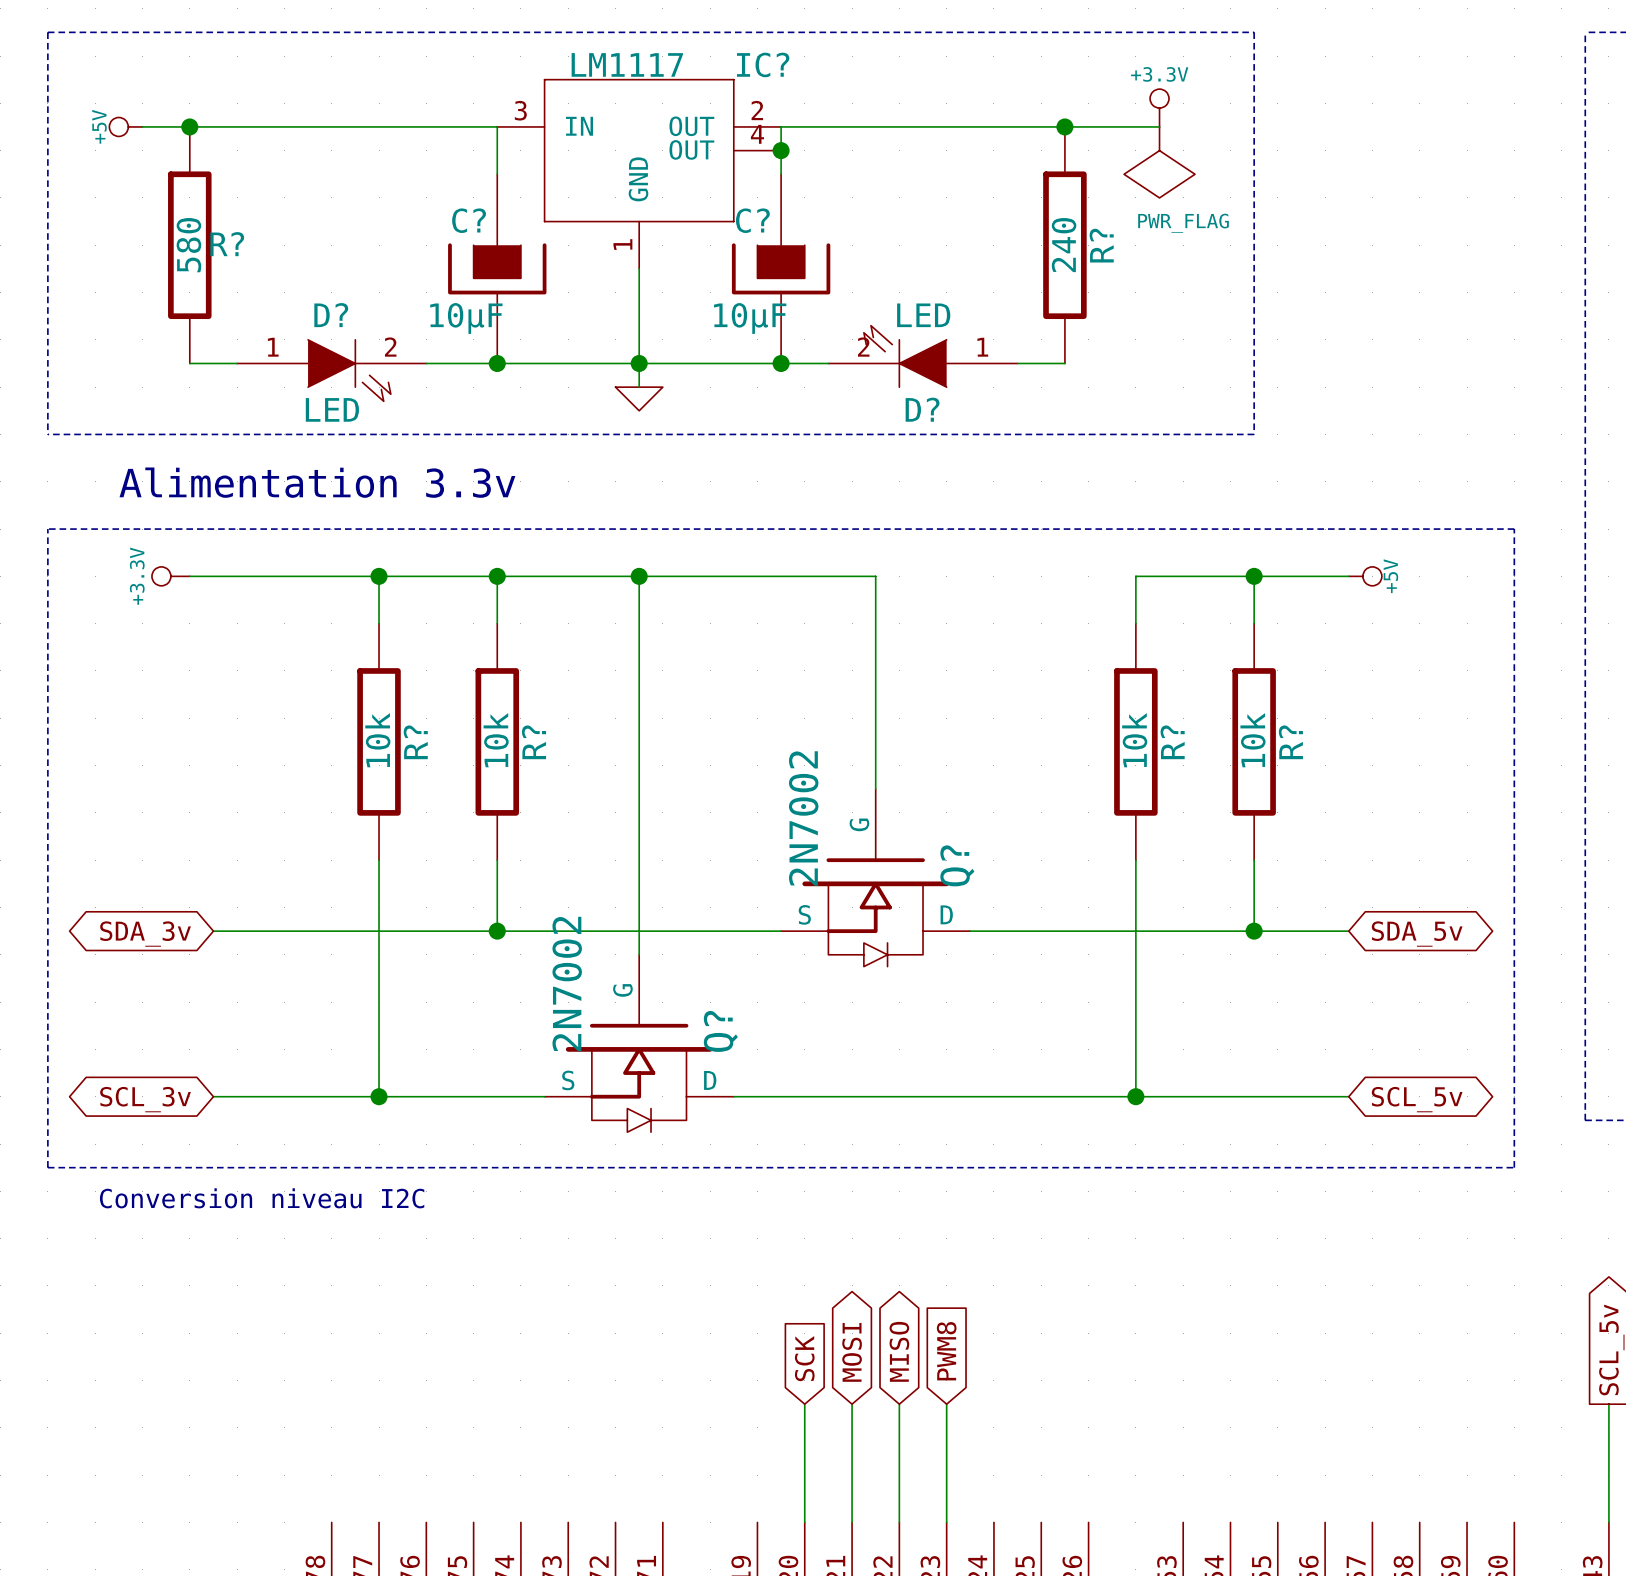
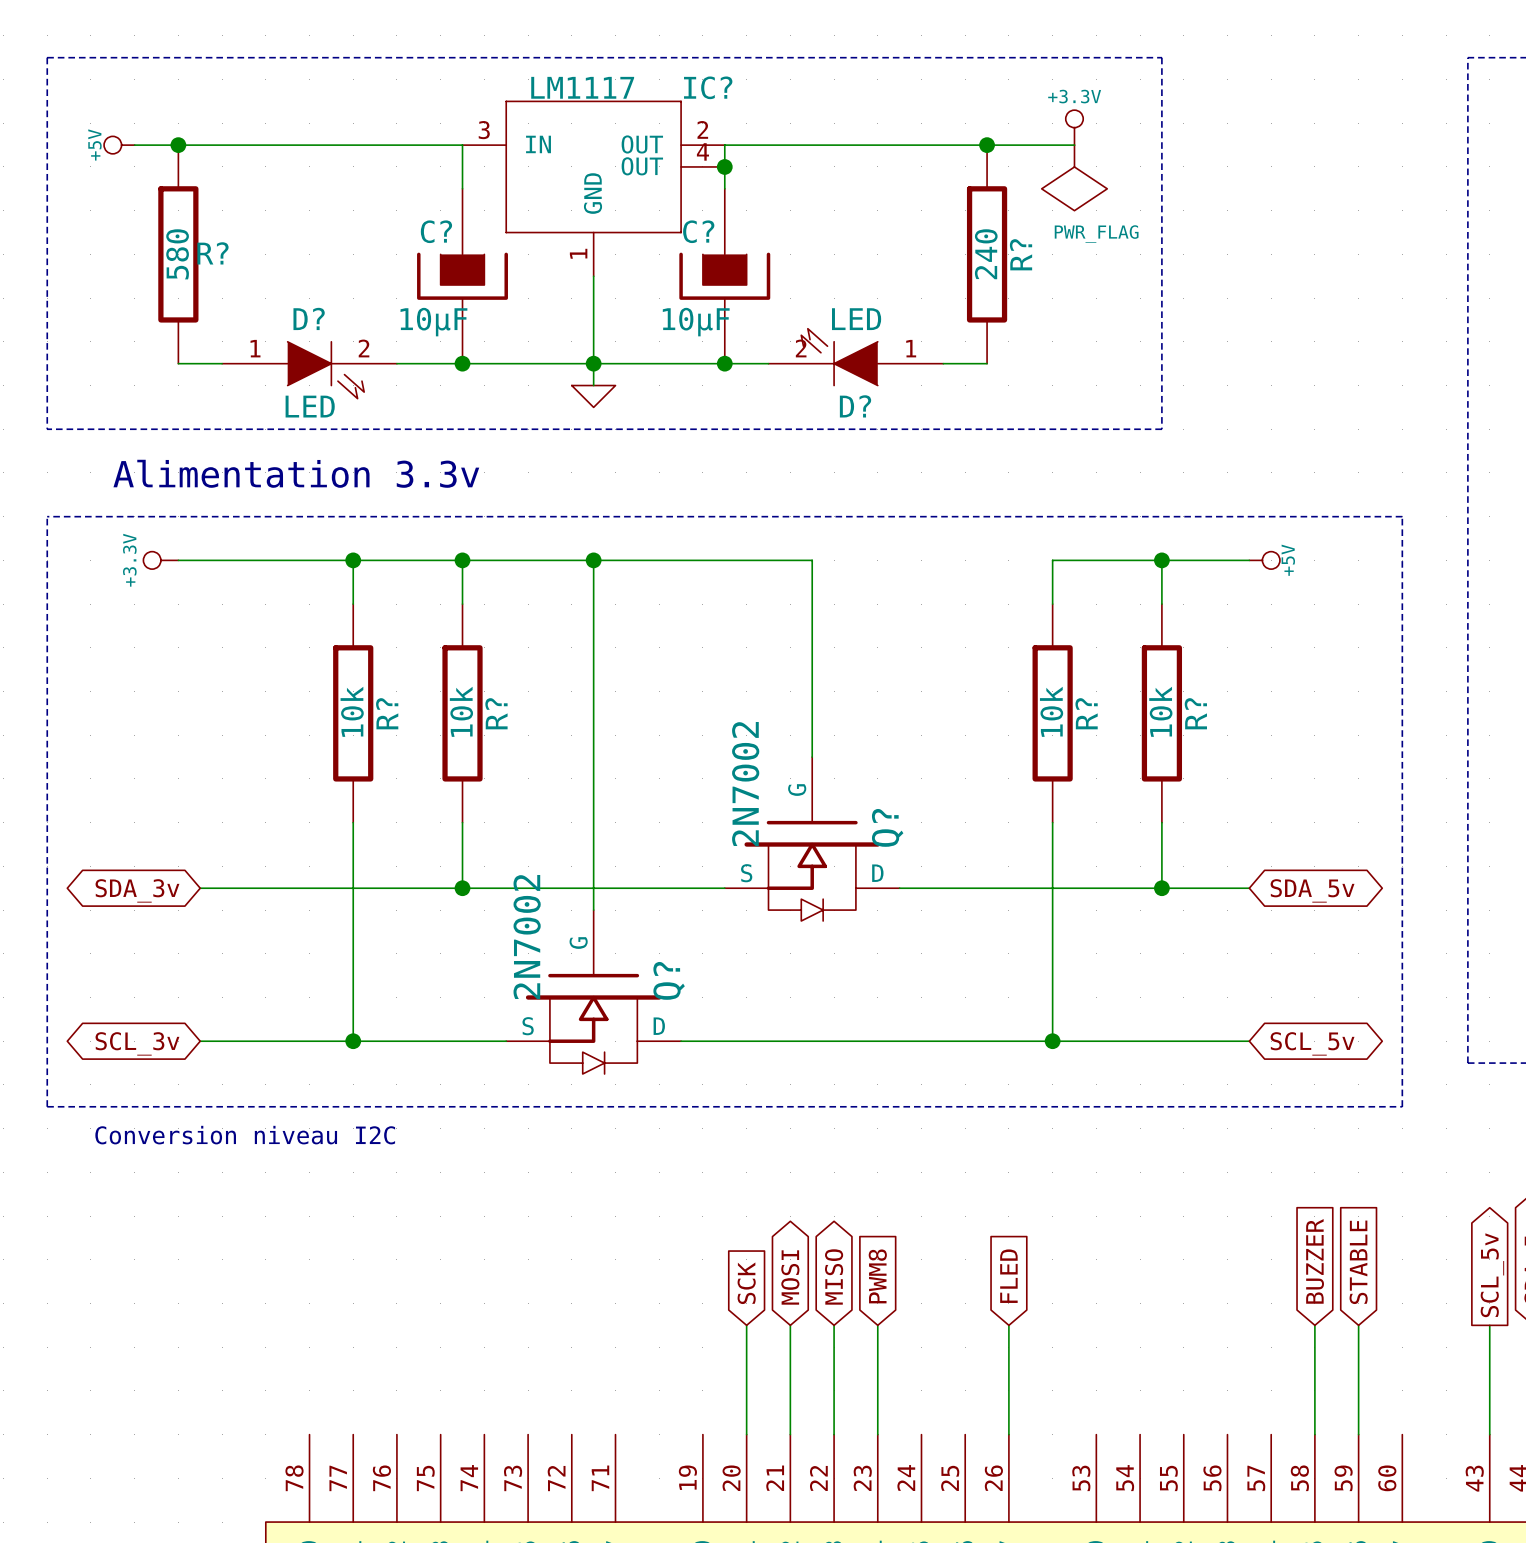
global label: none -> BUZZER (1315, 1261)
global label: none -> STABLE (1358, 1262)
global label: none -> FLED (1008, 1276)
wire: none -> (1008, 1325) (1008, 1434)
wire: none -> (1314, 1325) (1314, 1434)
wire: none -> (1358, 1325) (1358, 1434)

